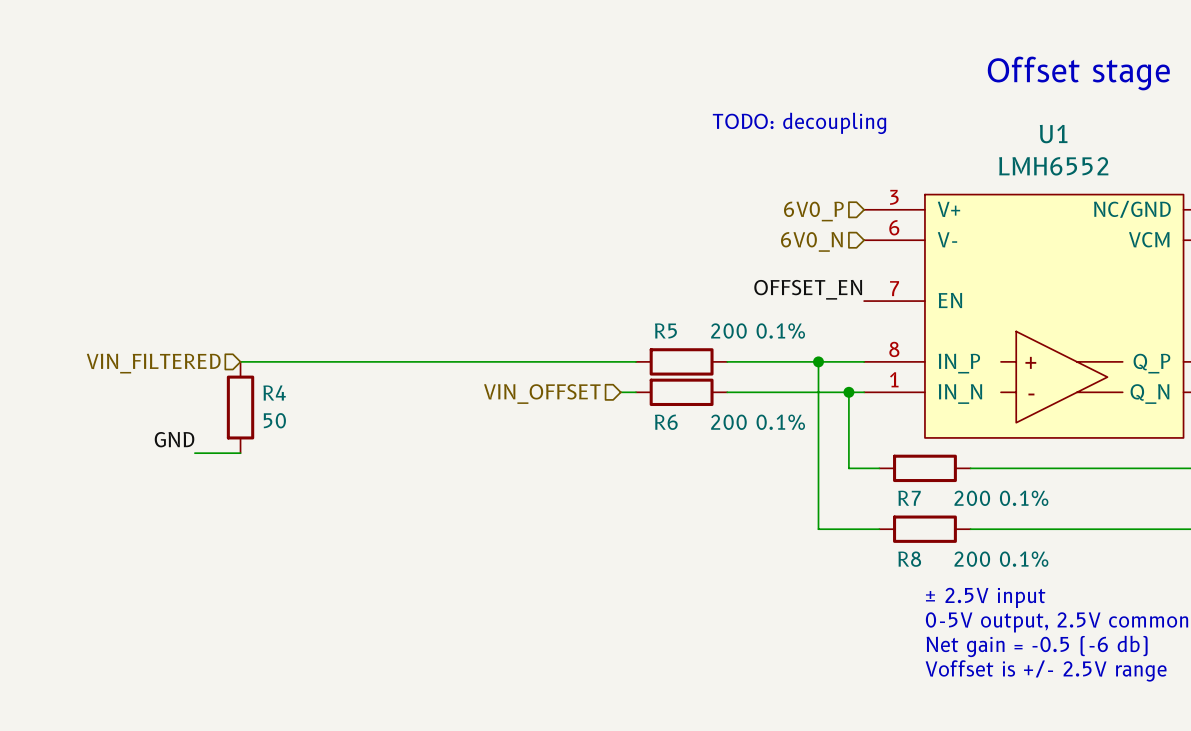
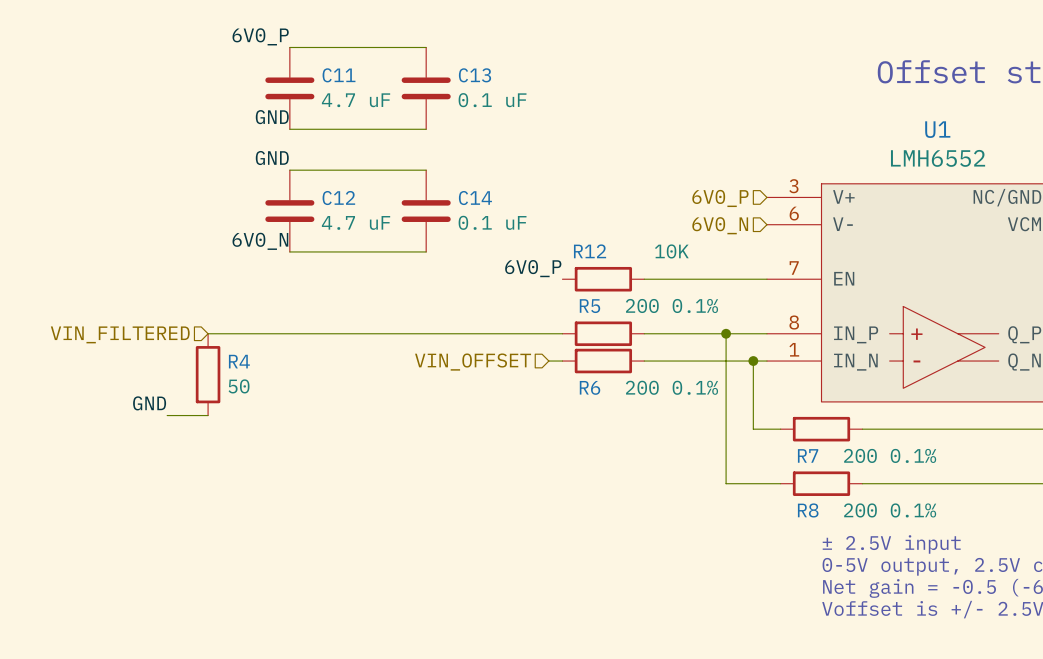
label: none -> 6V0_P (260, 36)
wire: none -> (289, 47) (426, 47)
C11: none -> 4.7 uF (289, 88)
C13: none -> 0.1 uF (426, 88)
label: none -> GND (272, 117)
text: TODO: decoupling (799, 123) -> none
wire: none -> (289, 129) (426, 129)
label: none -> GND (272, 158)
wire: none -> (289, 170) (426, 170)
C12: none -> 4.7 uF (289, 211)
C14: none -> 0.1 uF (426, 211)
label: none -> 6V0_N (260, 241)
wire: none -> (289, 251) (426, 251)
label: none -> 6V0_P (533, 268)
label: OFFSET_EN (808, 289) -> none
R12: none -> 10K (603, 279)
wire: none -> (644, 279) (766, 279)

